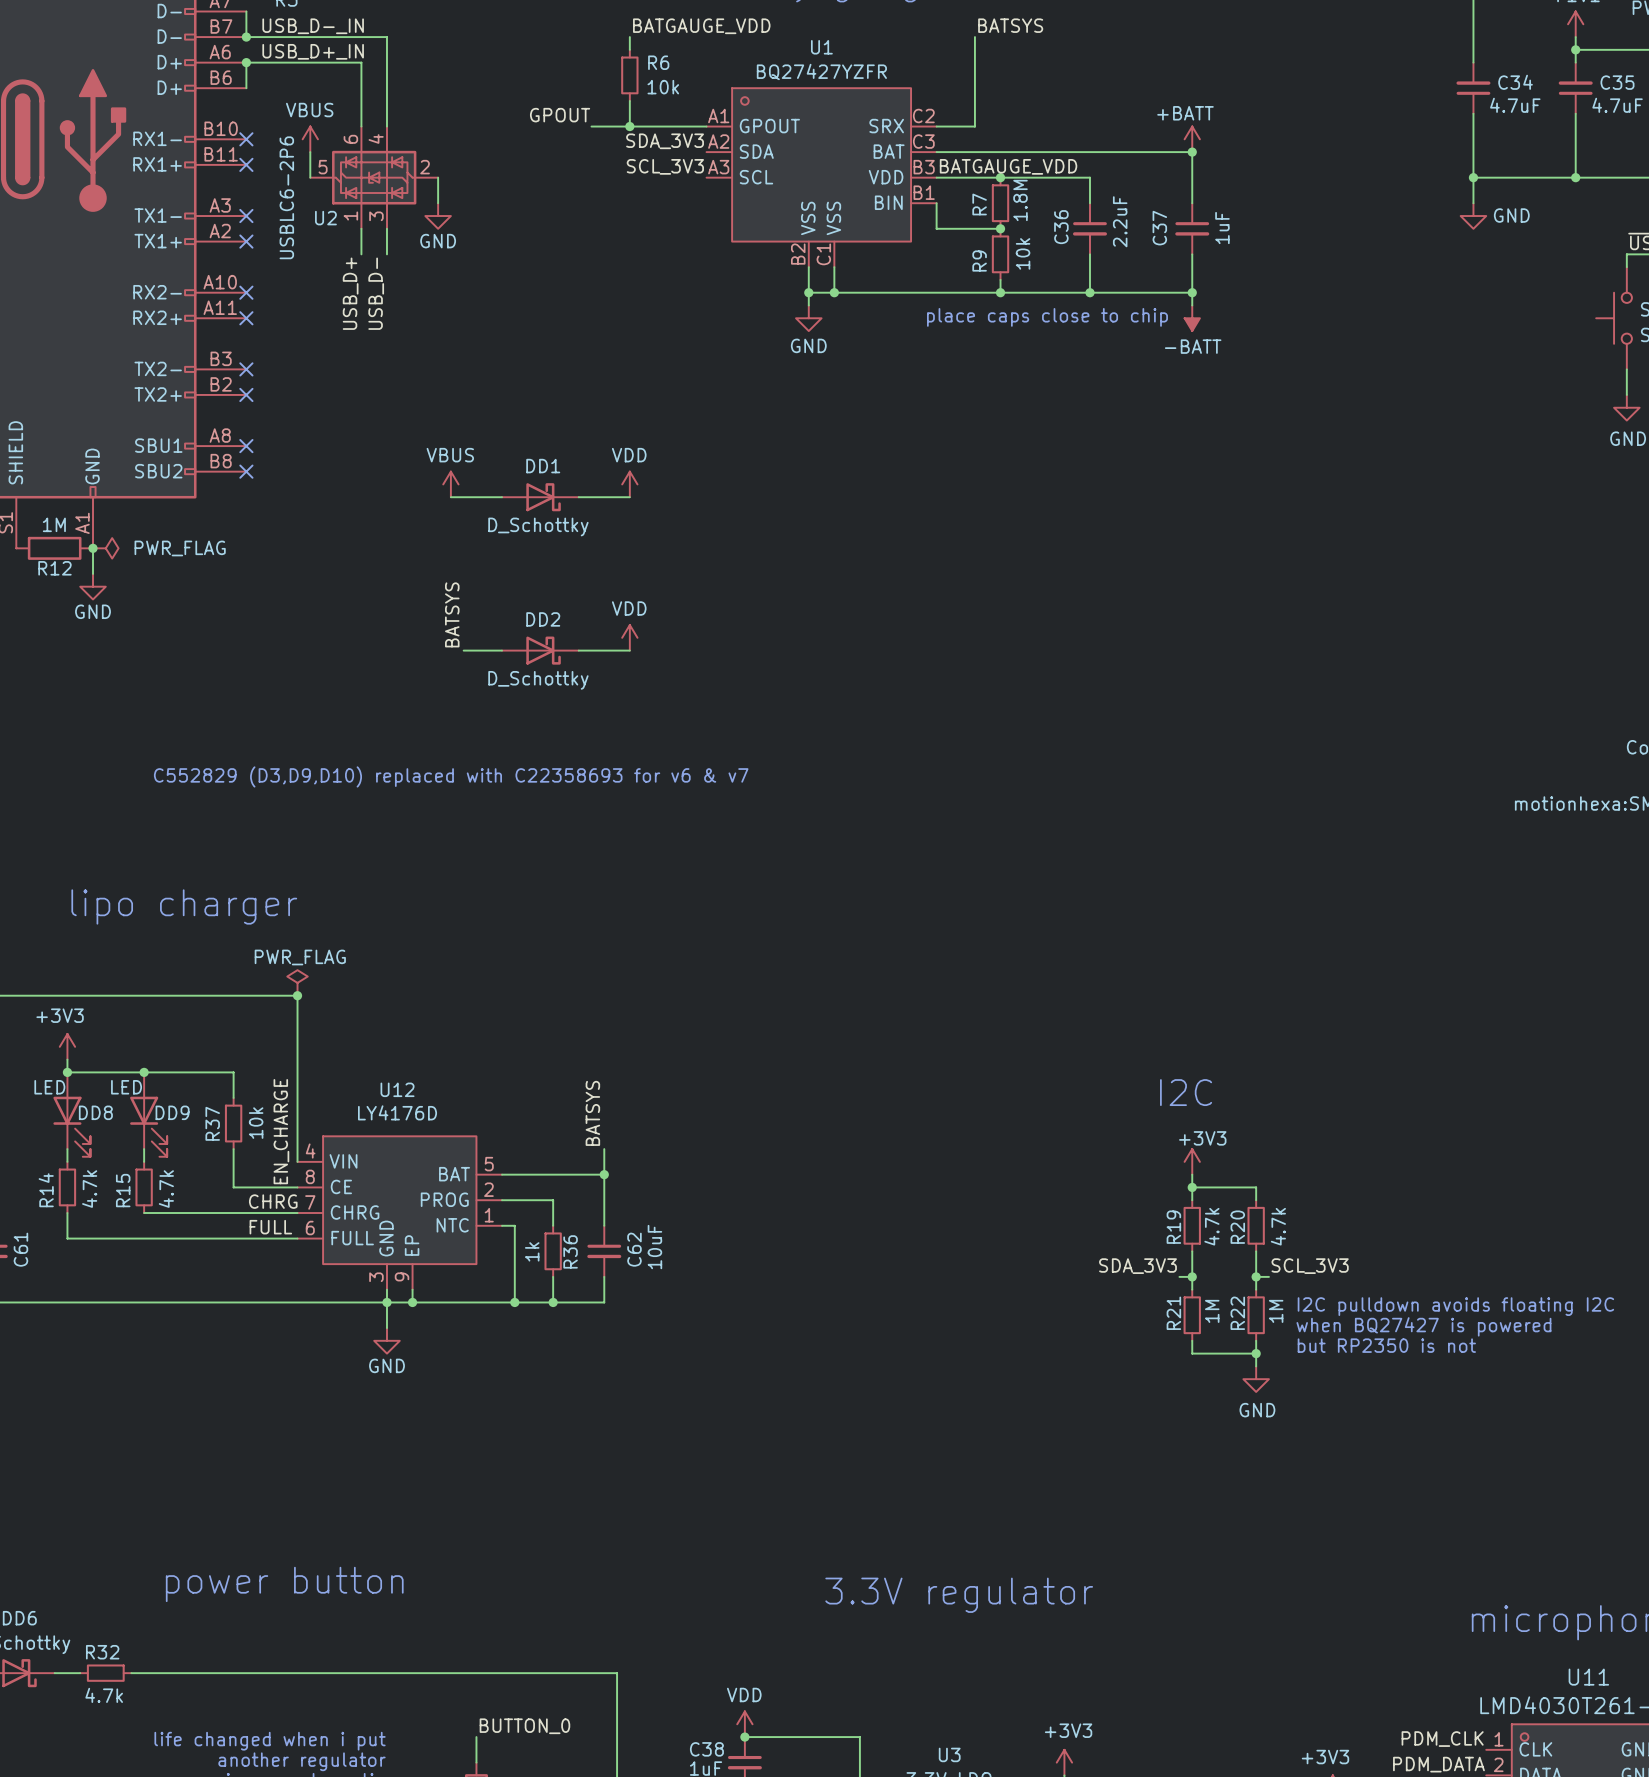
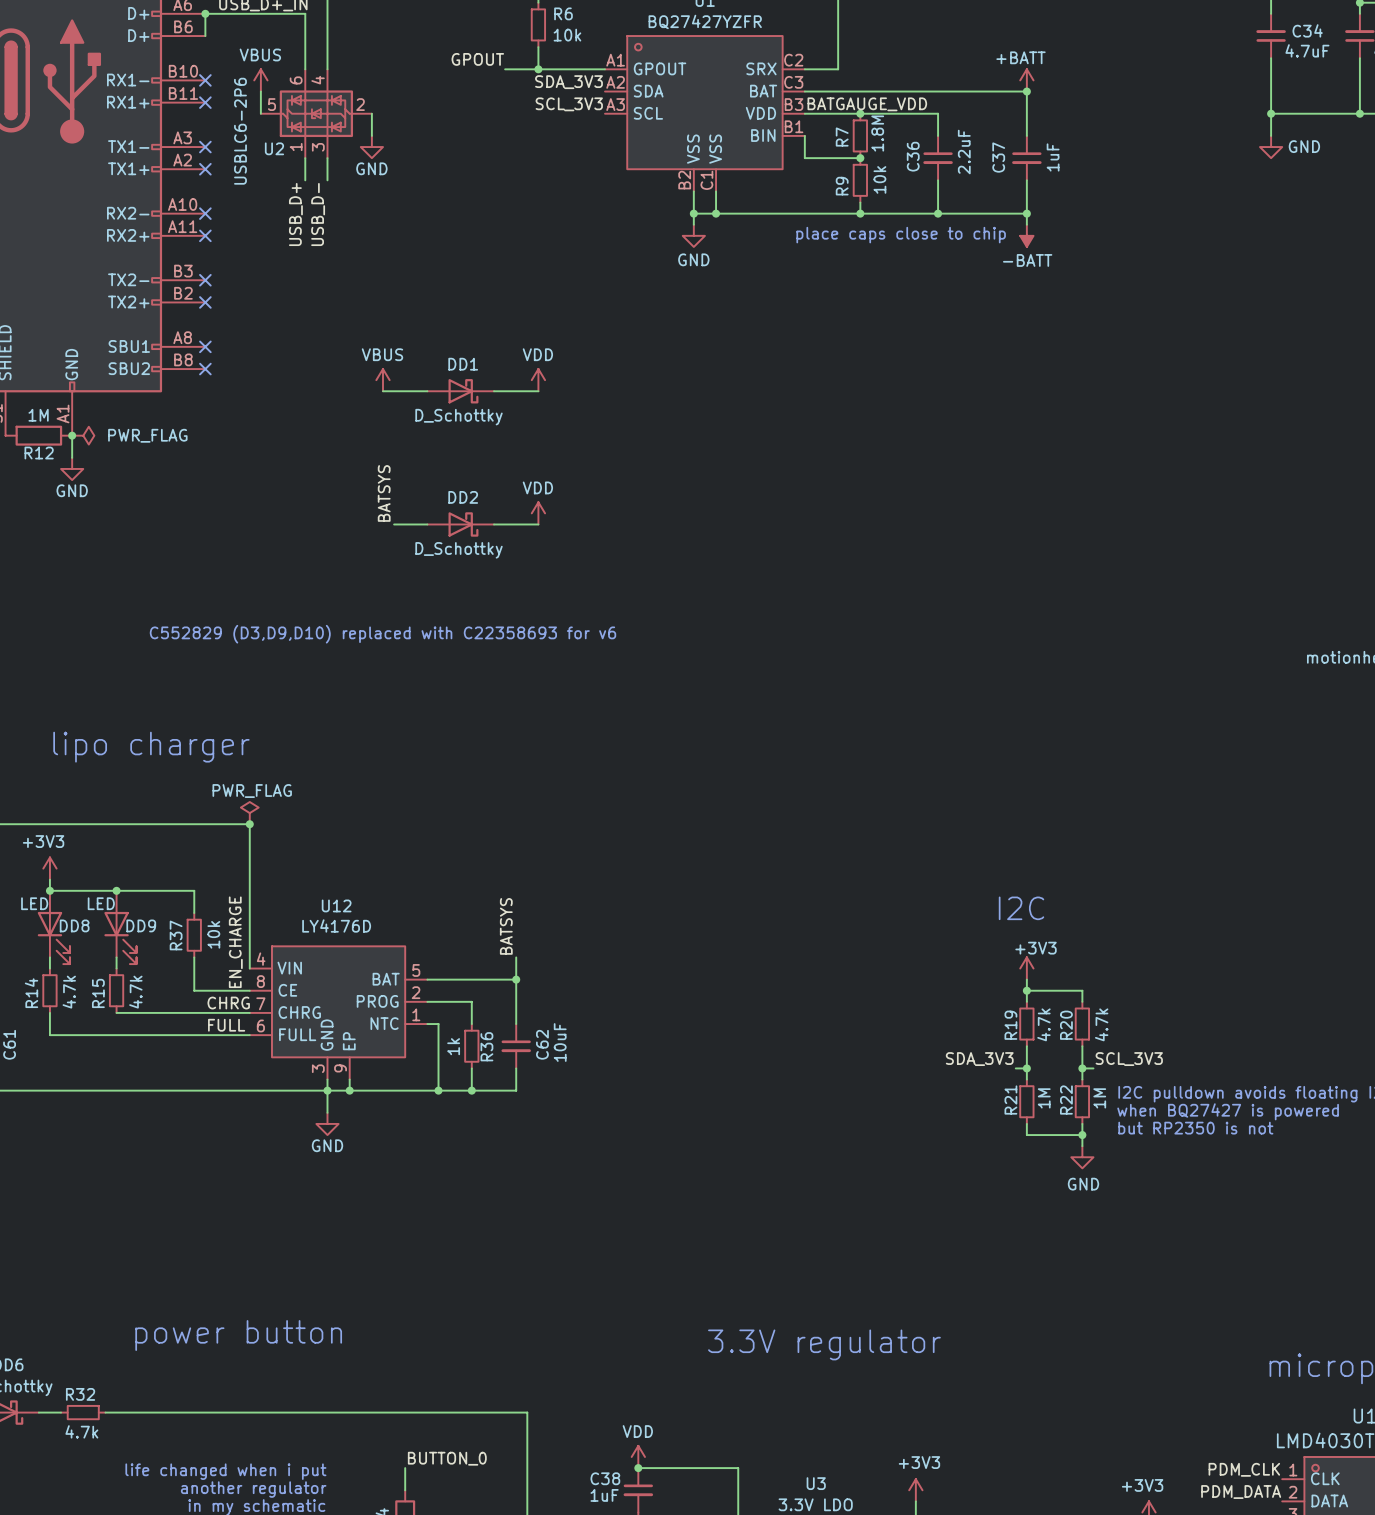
text: C552829 (D3,D9,D10) replaced with C22358693 for v6 & v7 (451, 776) -> C552829 (D3,D9,D10) replaced with C22358693 for v6 (382, 634)

